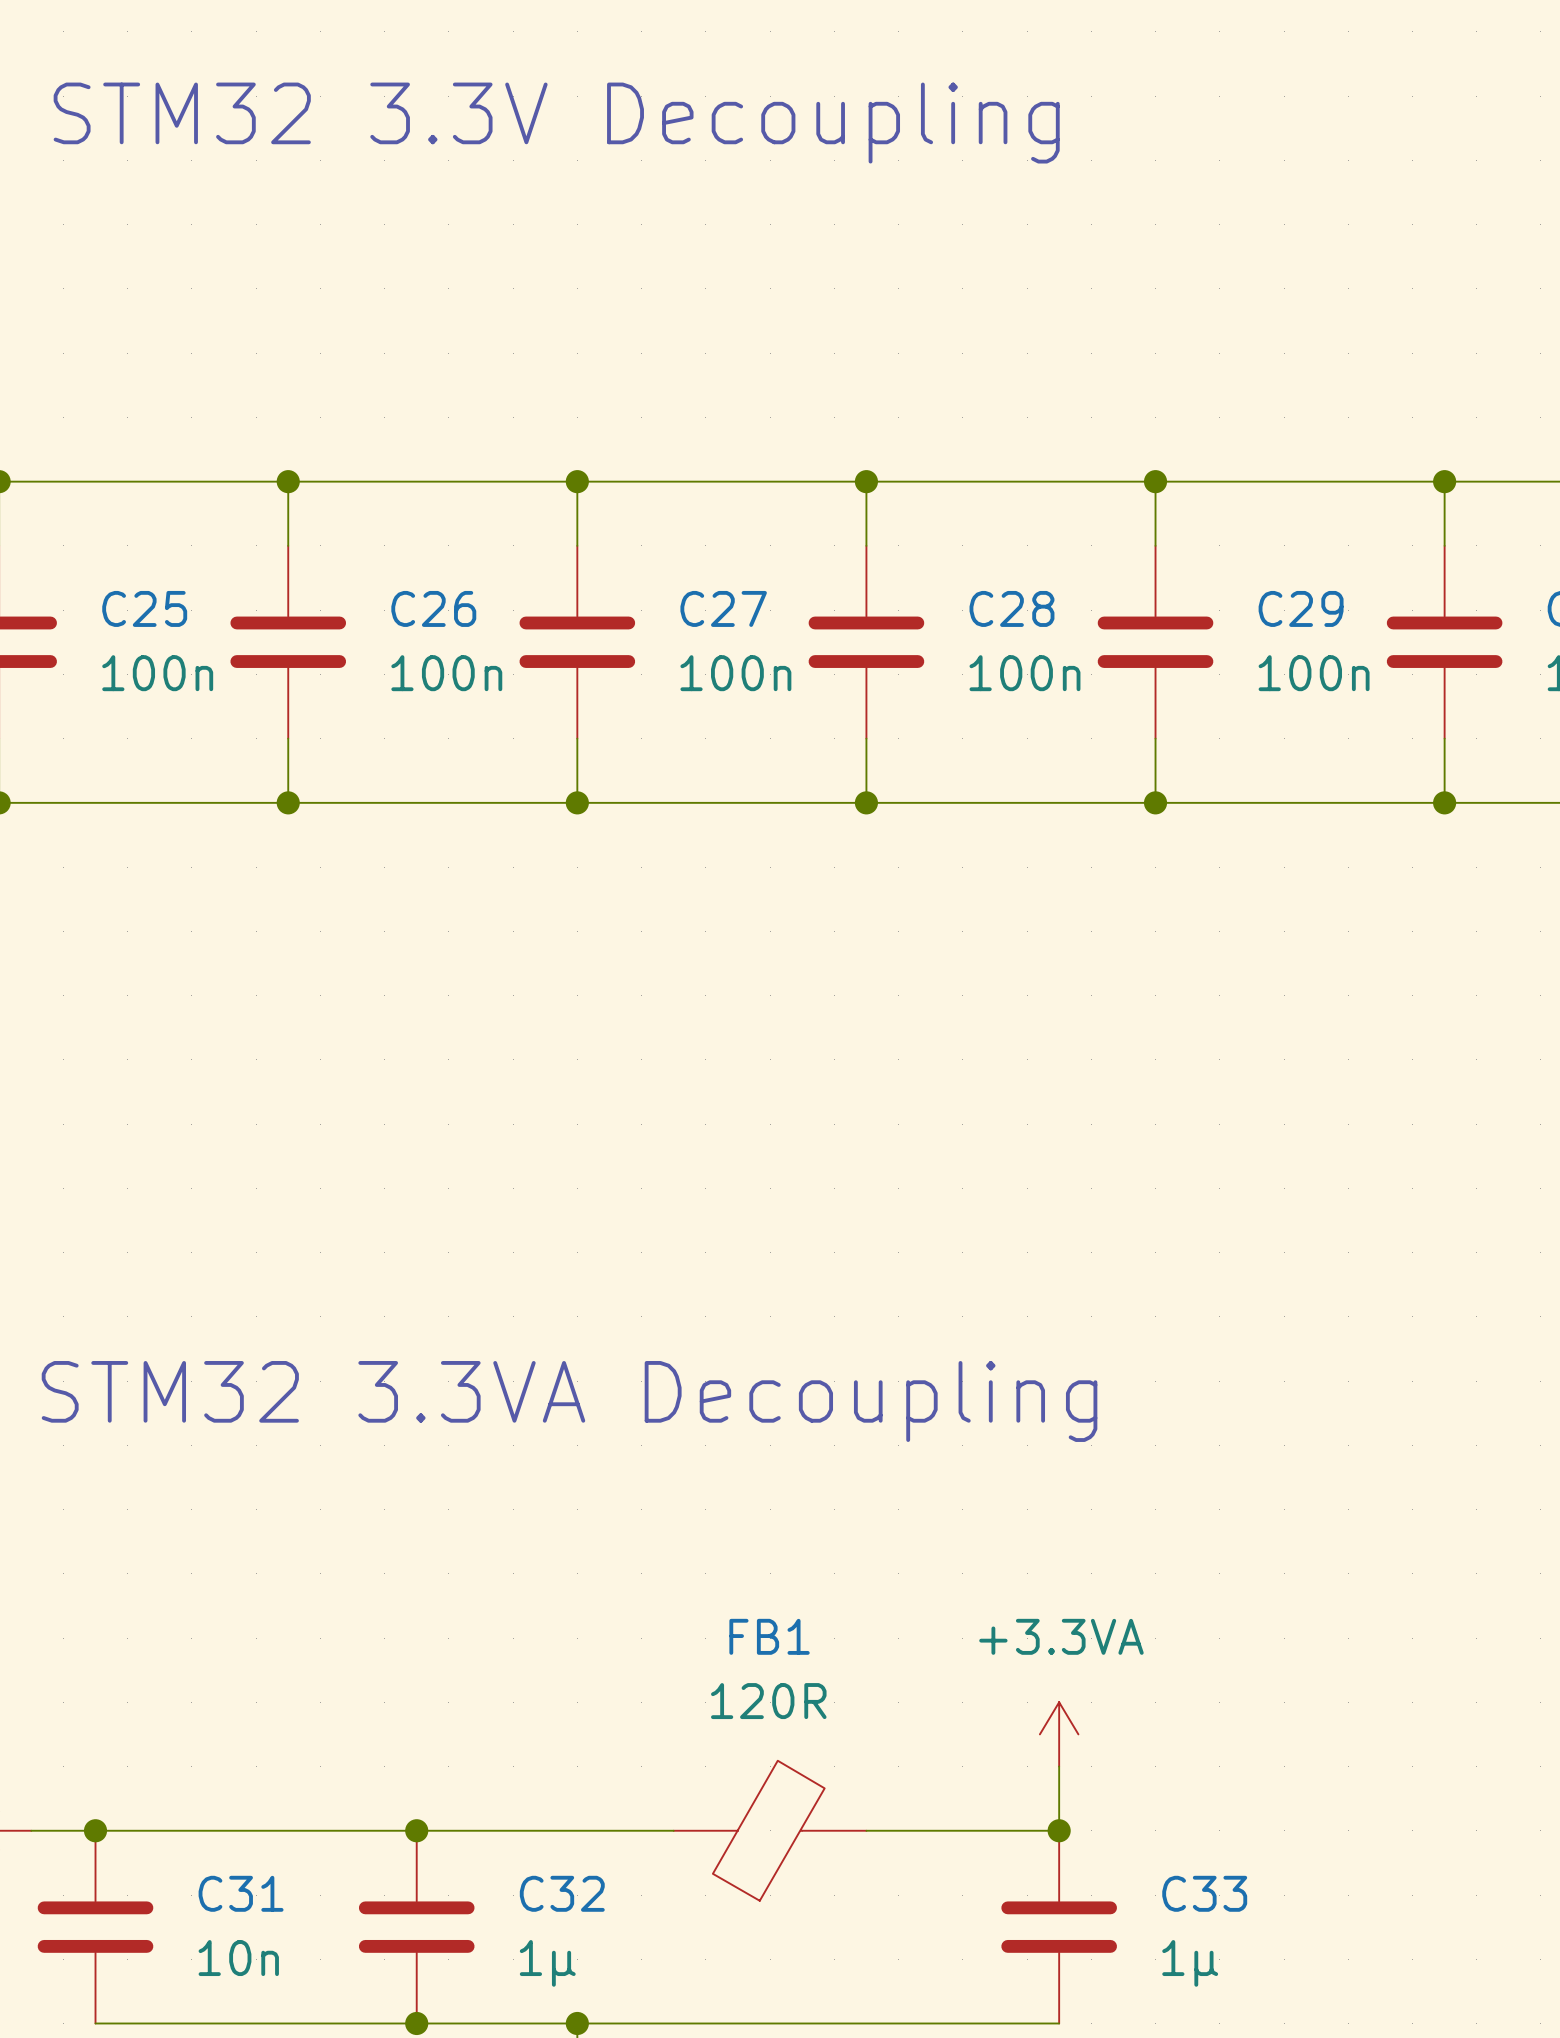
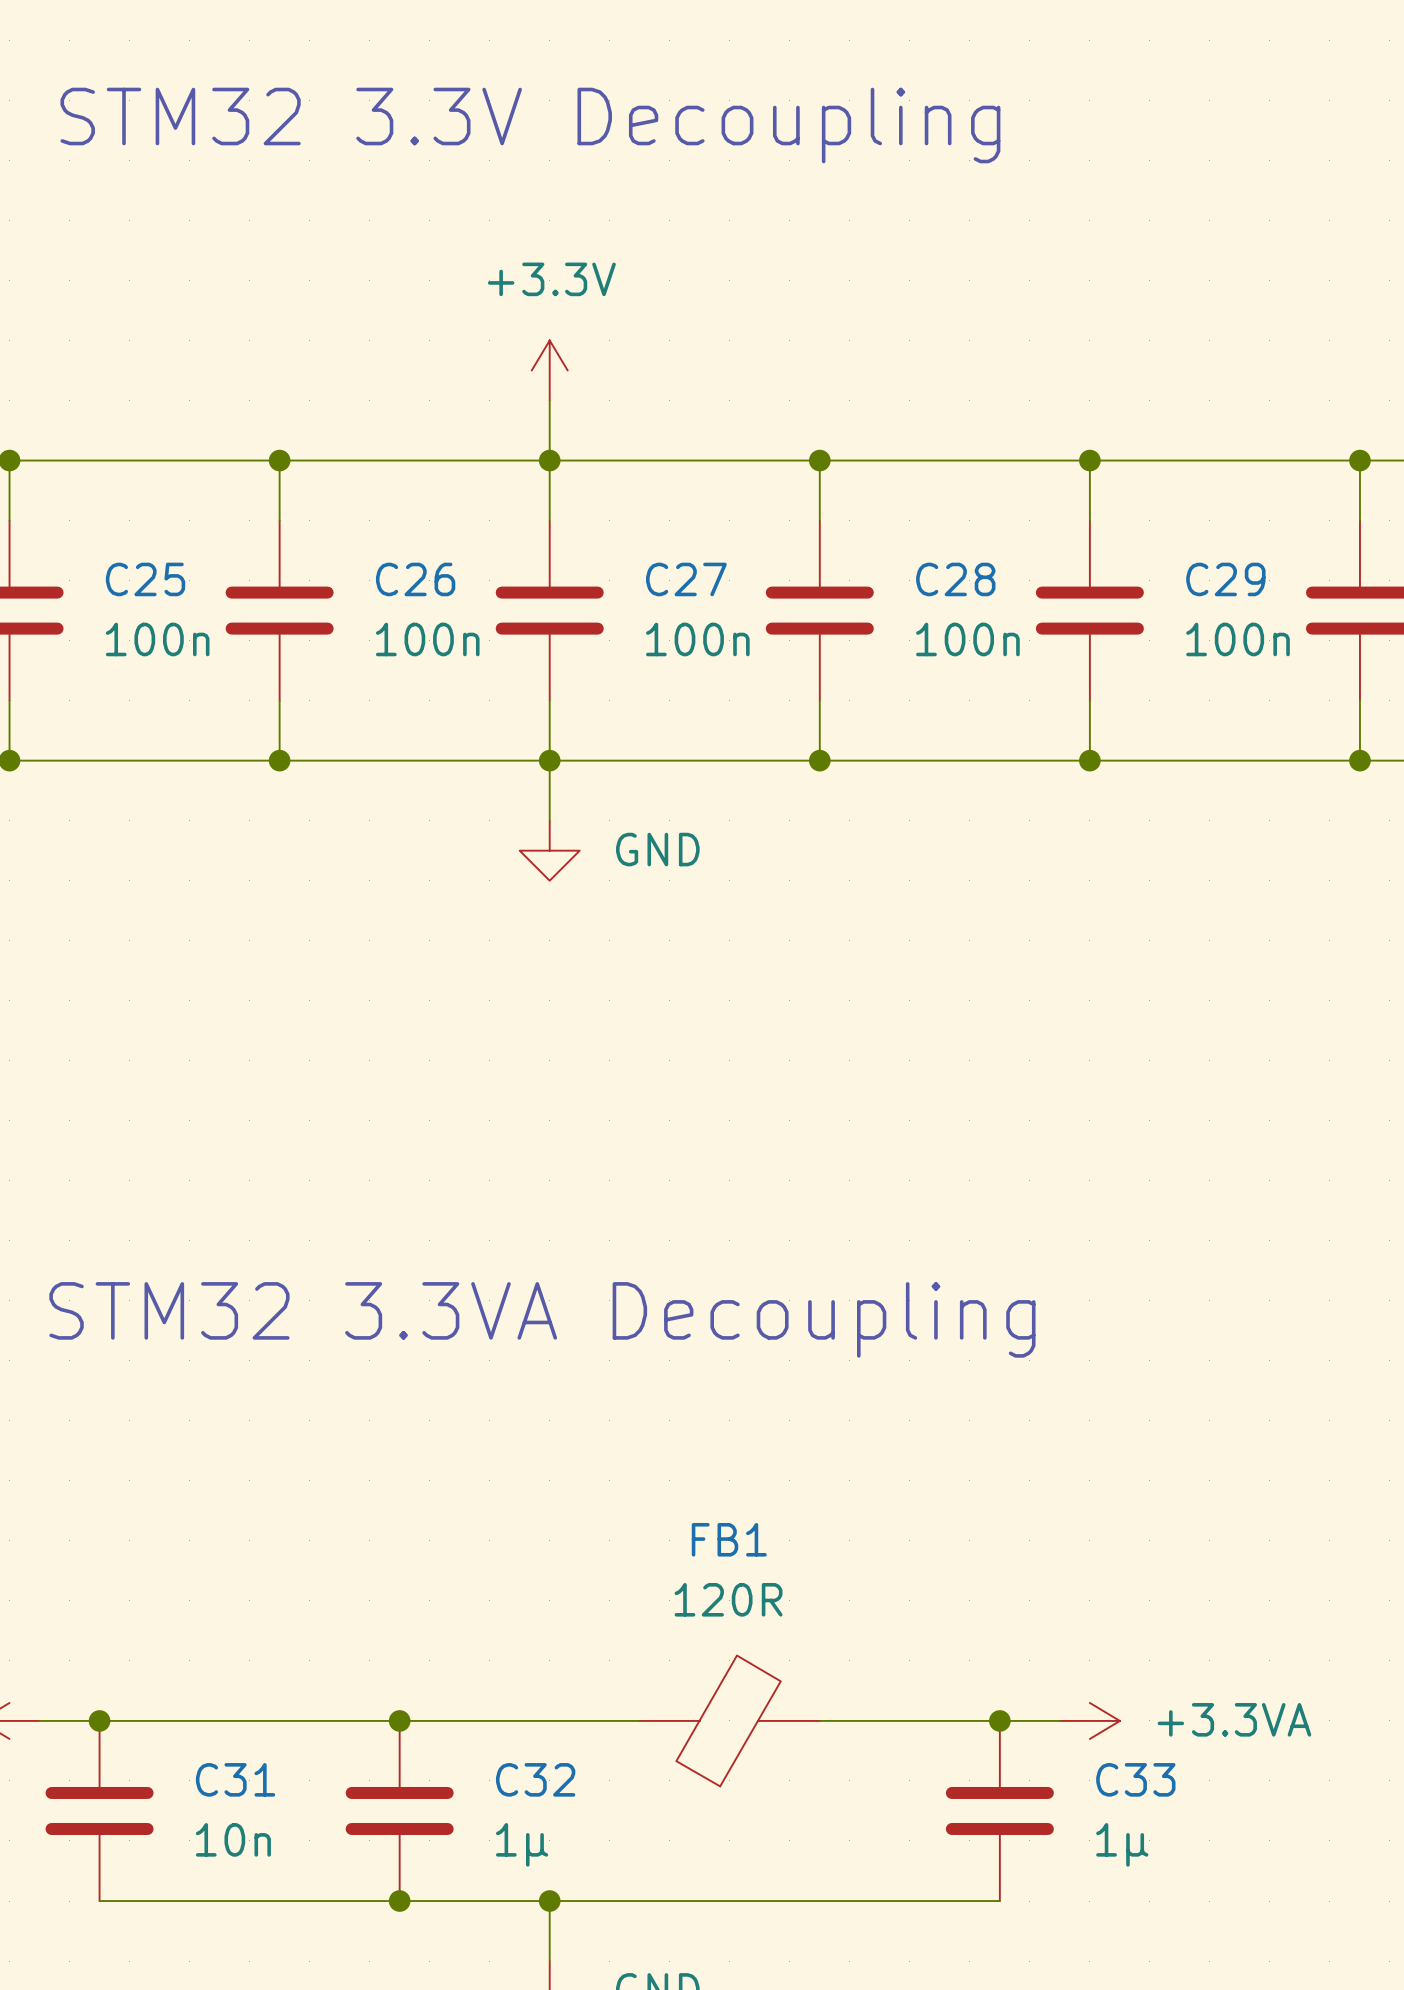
power symbol: none -> +3.3V (549, 370)
wire: none -> (549, 400) (549, 460)
wire: none -> (549, 760) (549, 820)
power symbol: none -> GND (549, 850)
power symbol text position: +3.3VA (1061, 1636) -> +3.3VA (1234, 1719)
power symbol rotation: 0° (1059, 1734) -> 90° clockwise (1089, 1720)
power symbol position: +3.3VA (1059, 1734) -> +3.3VA (1089, 1720)
wire: (1059, 1766) (1059, 1830) -> (1059, 1720) (999, 1720)

